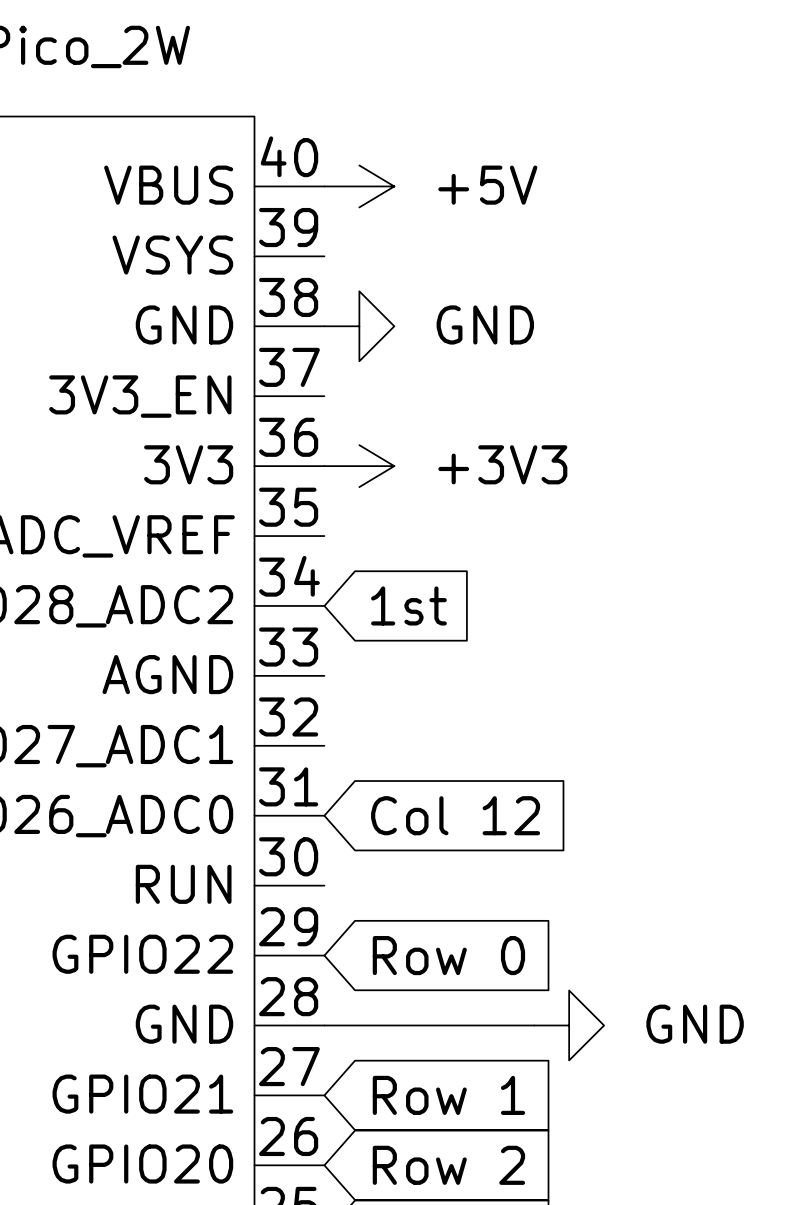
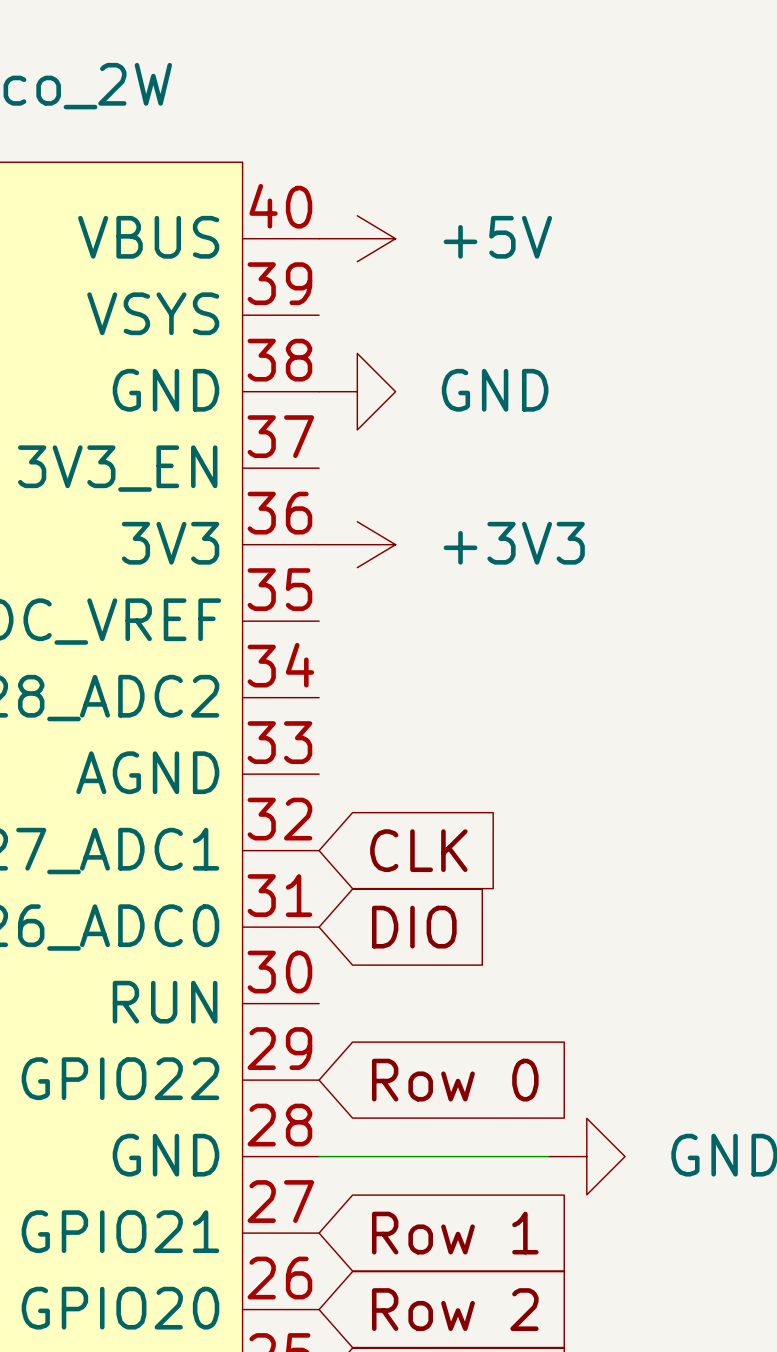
global label: 1st (408, 605) -> none
global label: none -> CLK (418, 850)
global label: Col 12 (455, 815) -> DIO (414, 927)

